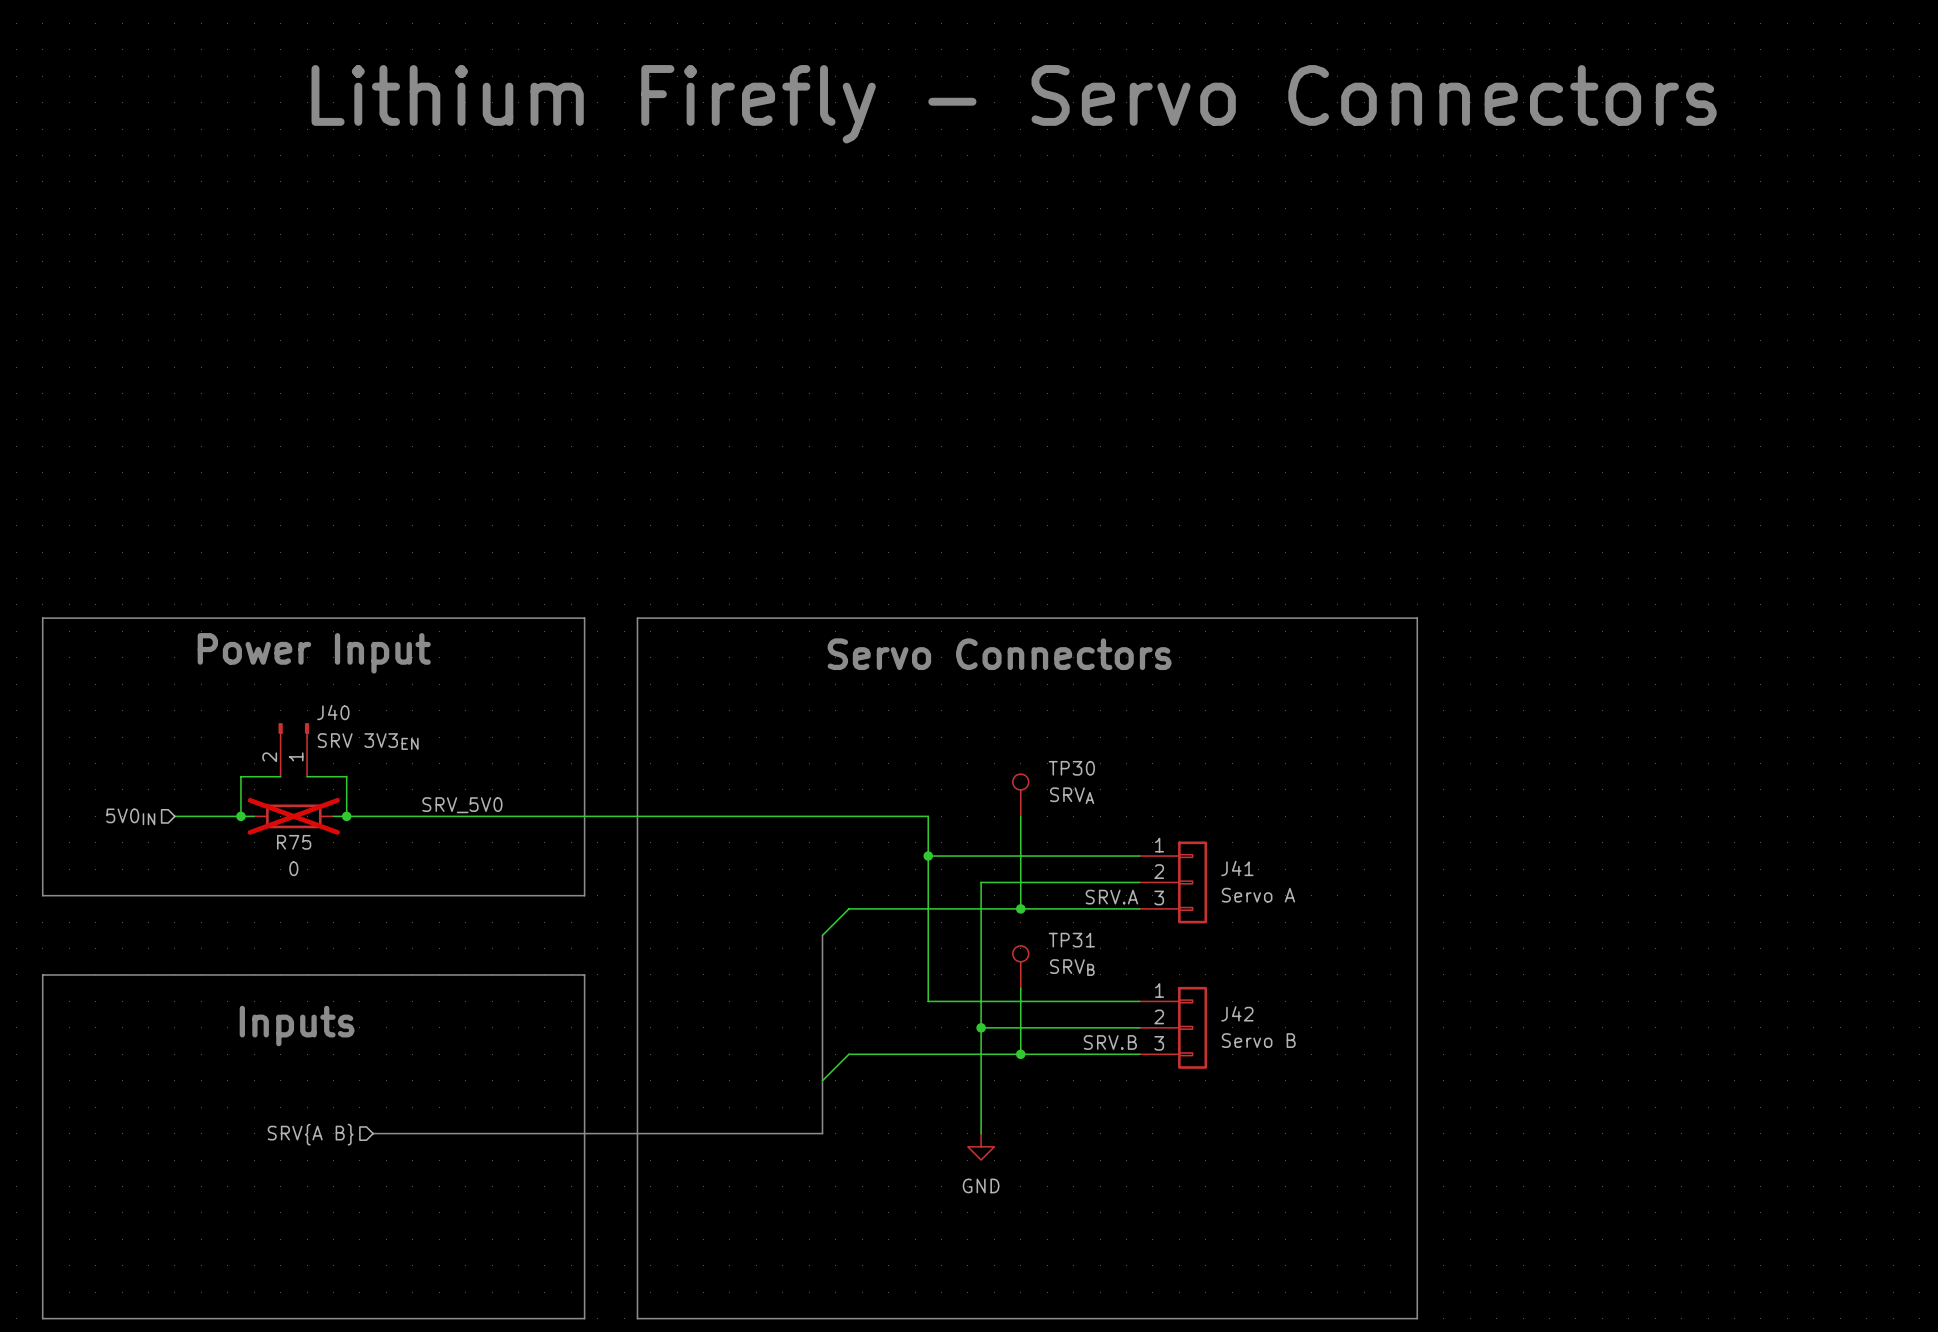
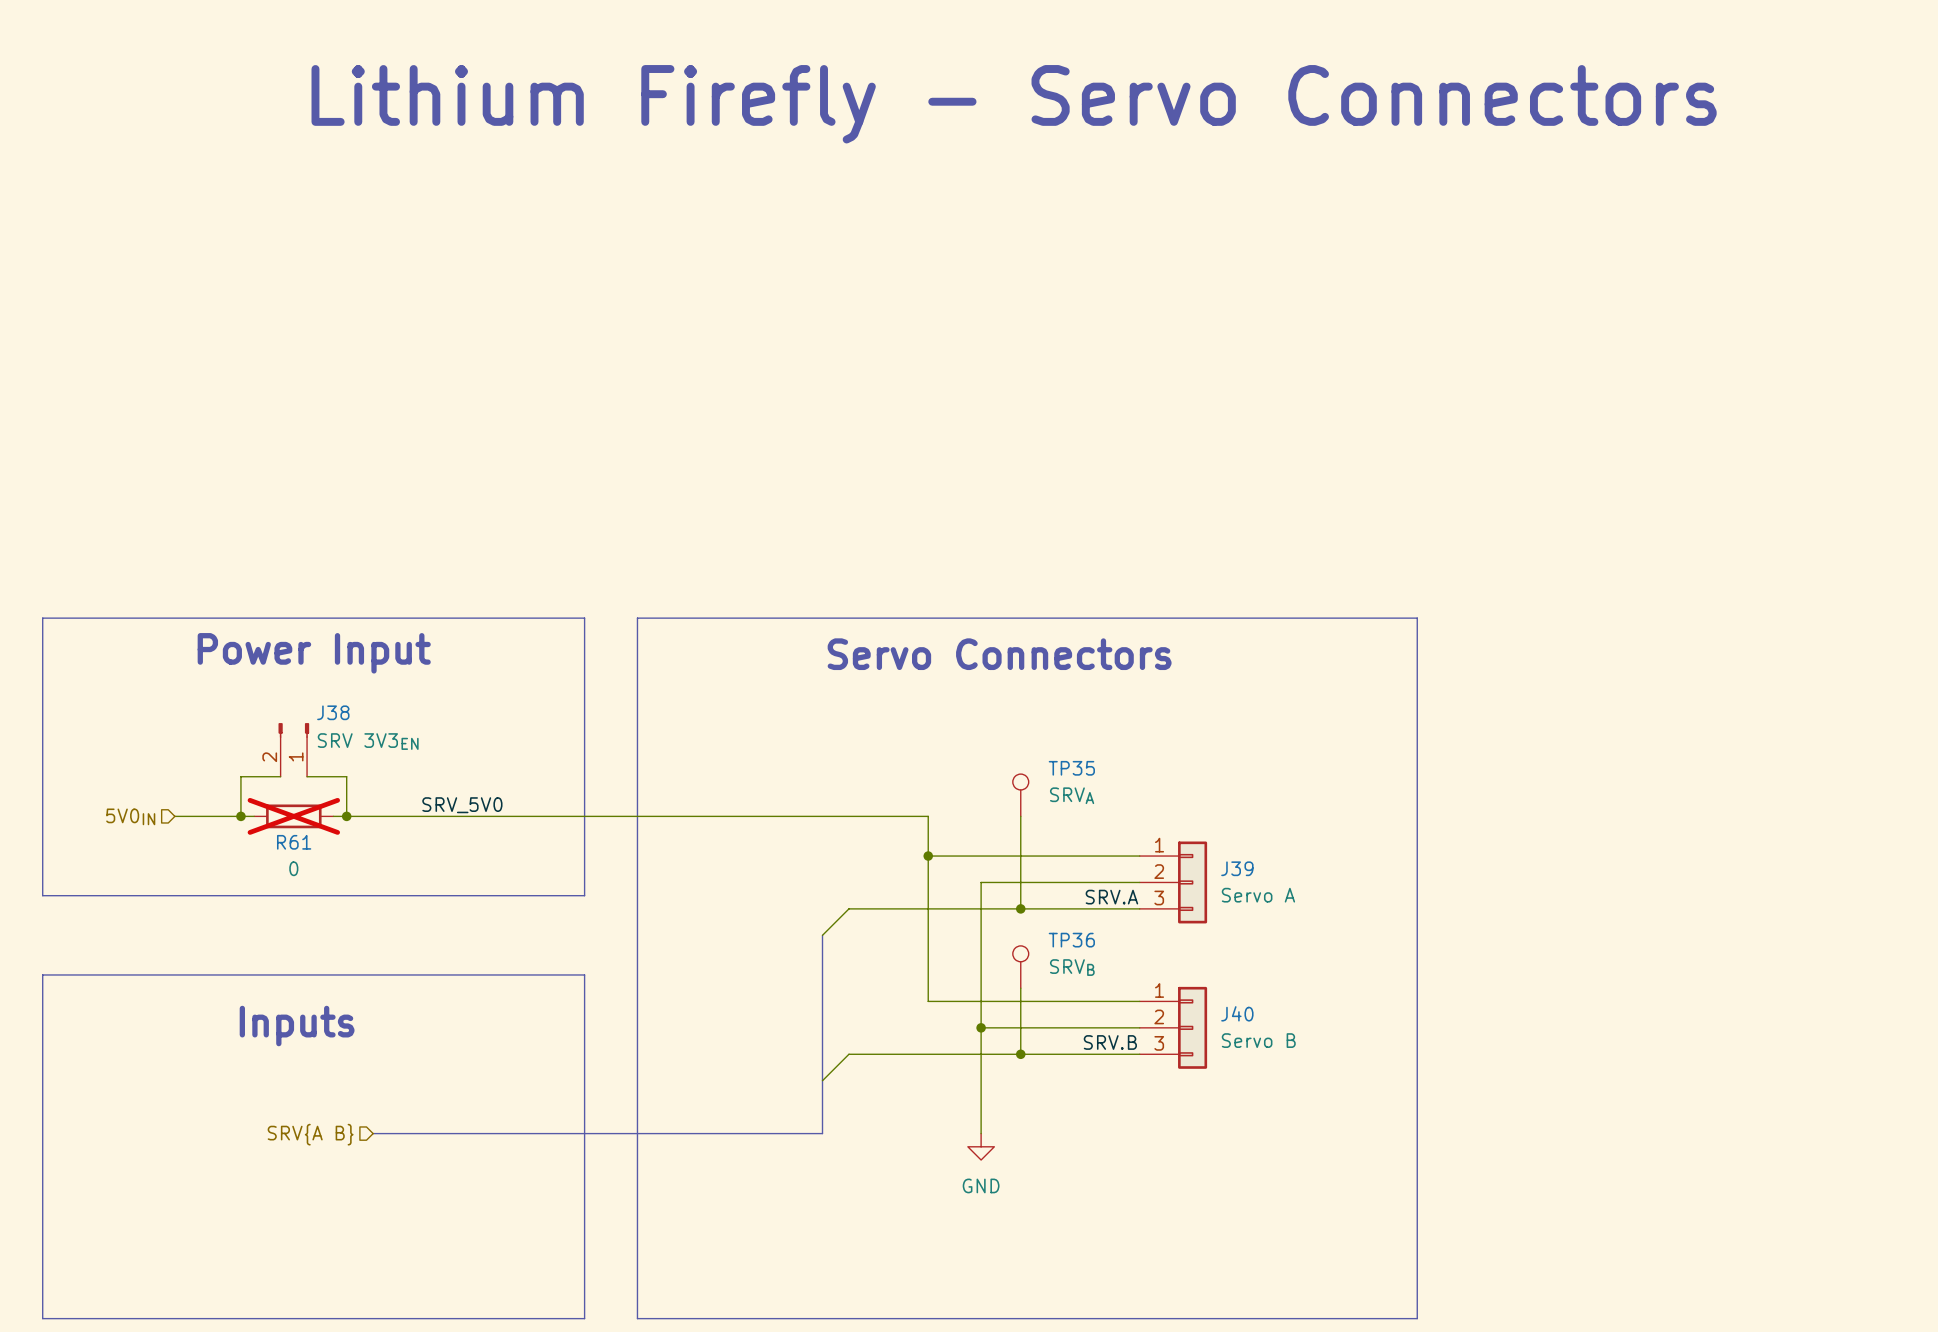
J40 name: J40 (333, 712) -> J38 (333, 712)
TP30 name: TP30 (1071, 768) -> TP35 (1071, 768)
R75 name: R75 (294, 842) -> R61 (294, 842)
J41 name: J41 (1237, 868) -> J39 (1237, 868)
TP31 name: TP31 (1071, 940) -> TP36 (1071, 940)
J42 name: J42 (1237, 1013) -> J40 (1237, 1013)

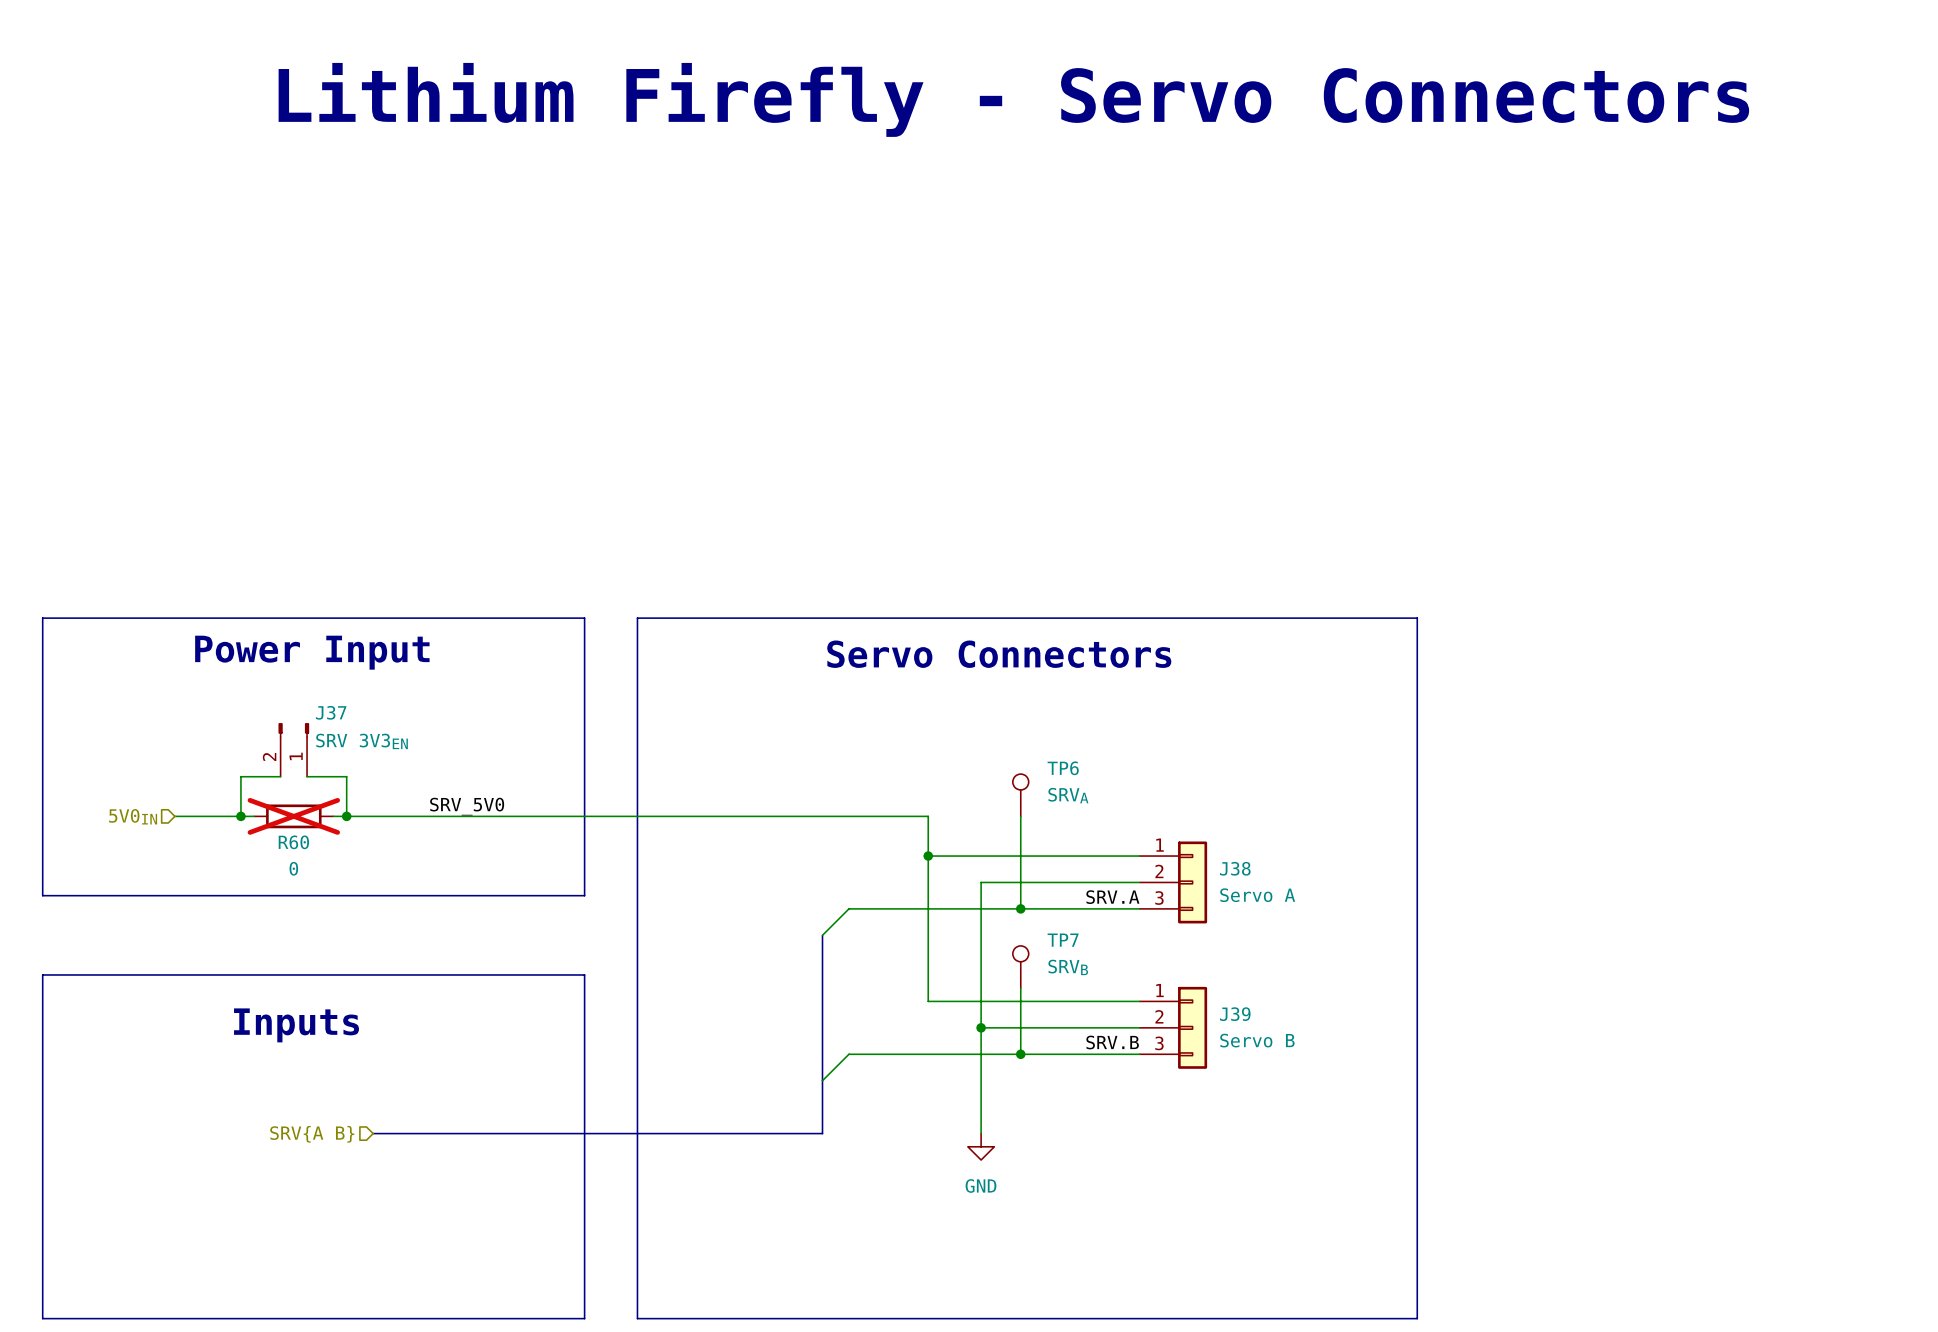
J38 name: J38 (333, 712) -> J37 (331, 712)
TP35 name: TP35 (1071, 768) -> TP6 (1063, 768)
R61 name: R61 (294, 842) -> R60 (293, 842)
J39 name: J39 (1237, 868) -> J38 (1235, 868)
TP36 name: TP36 (1071, 940) -> TP7 (1063, 940)
J40 name: J40 (1237, 1013) -> J39 (1235, 1014)

